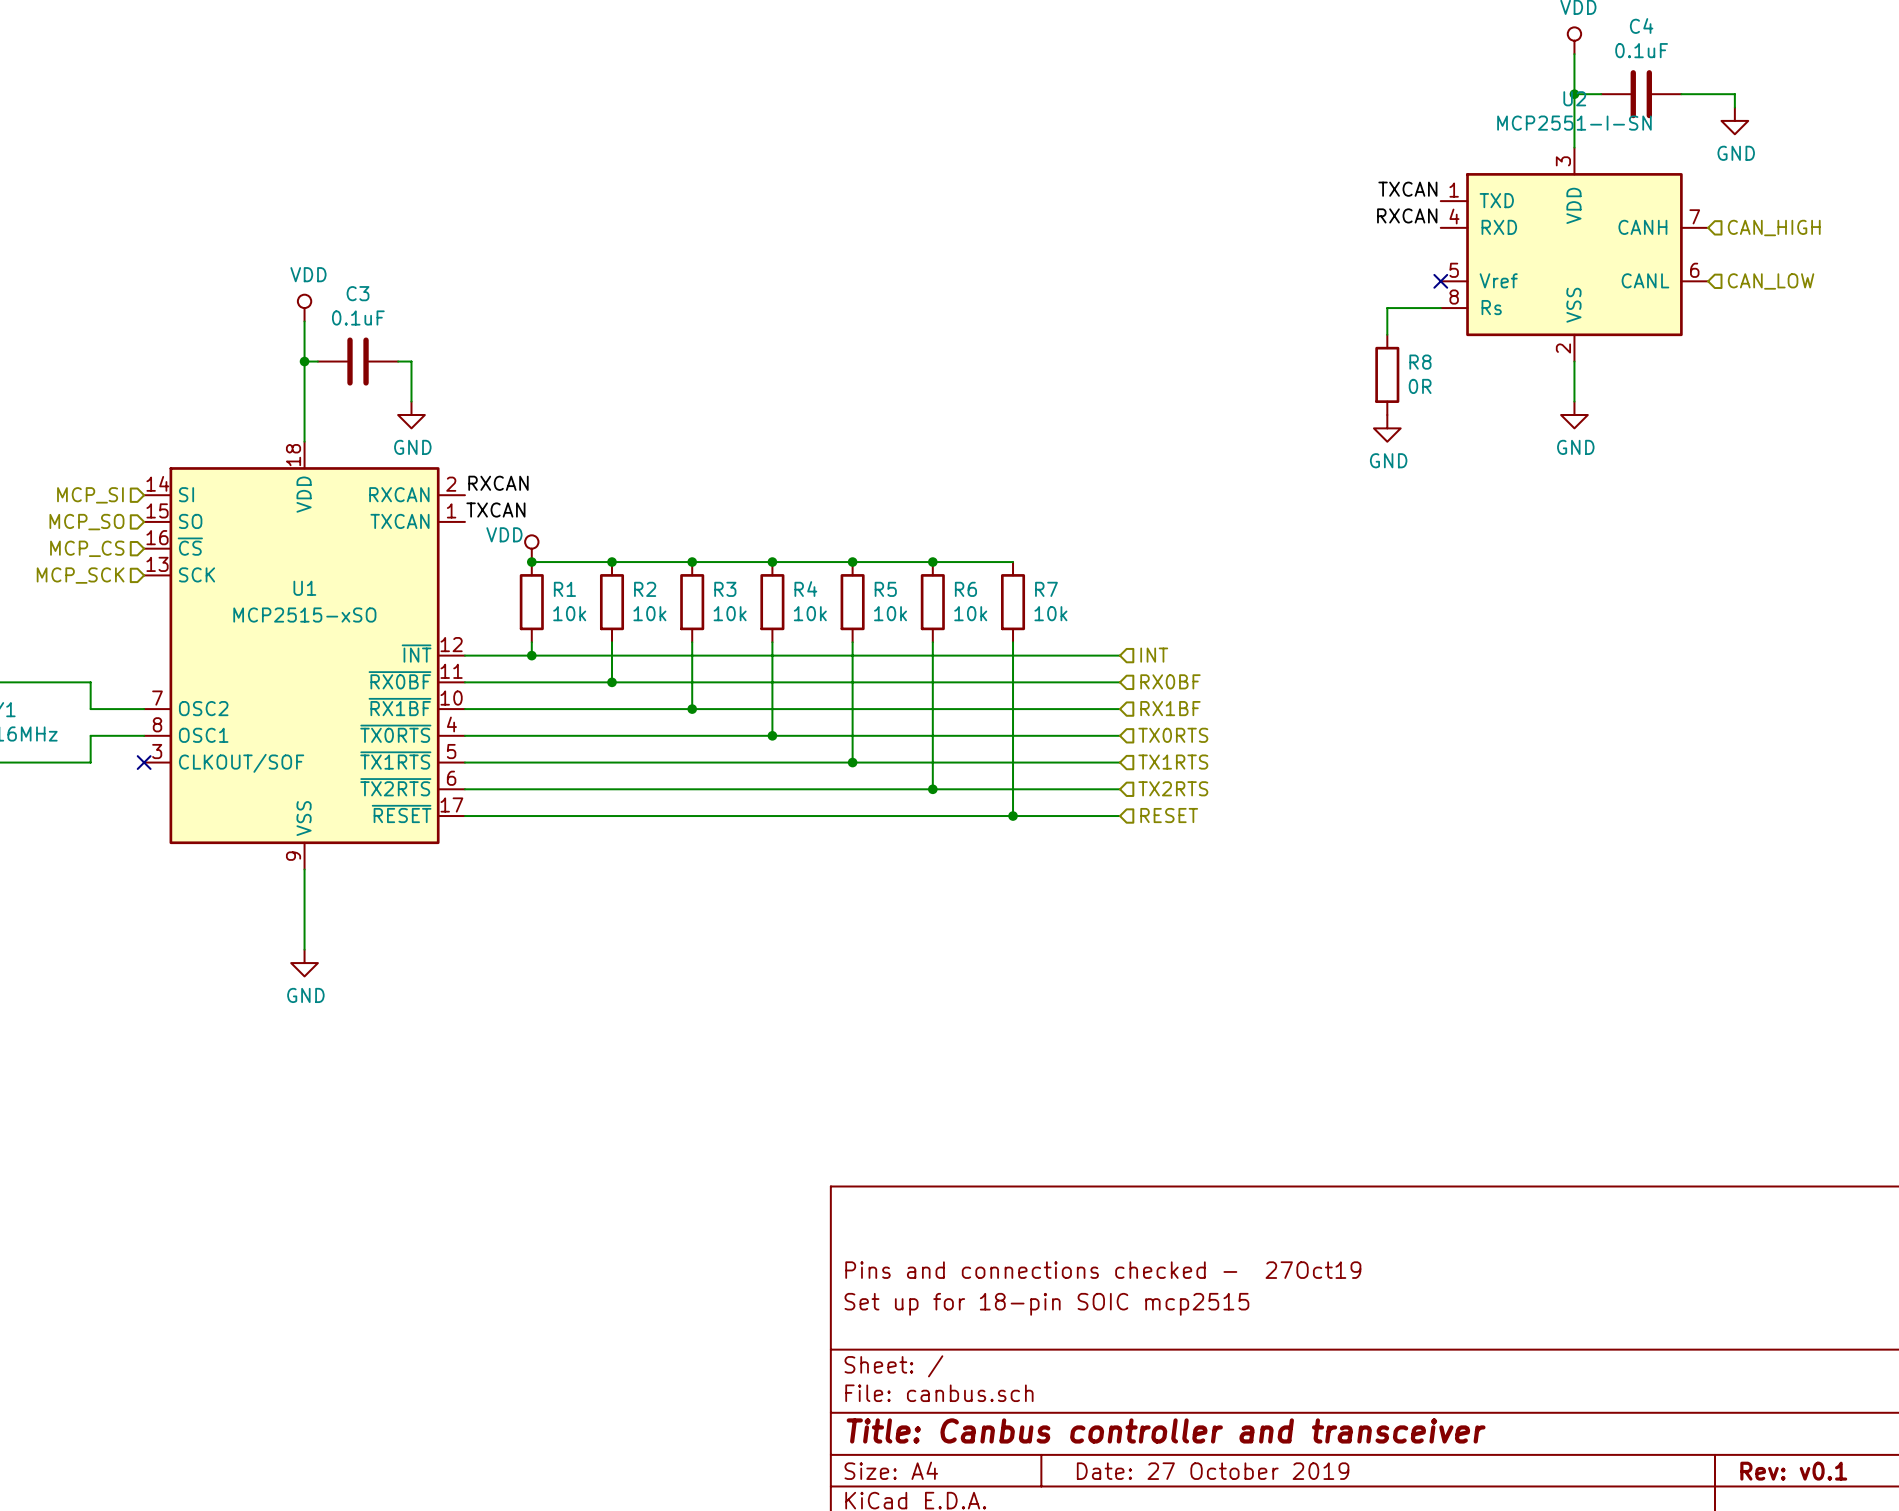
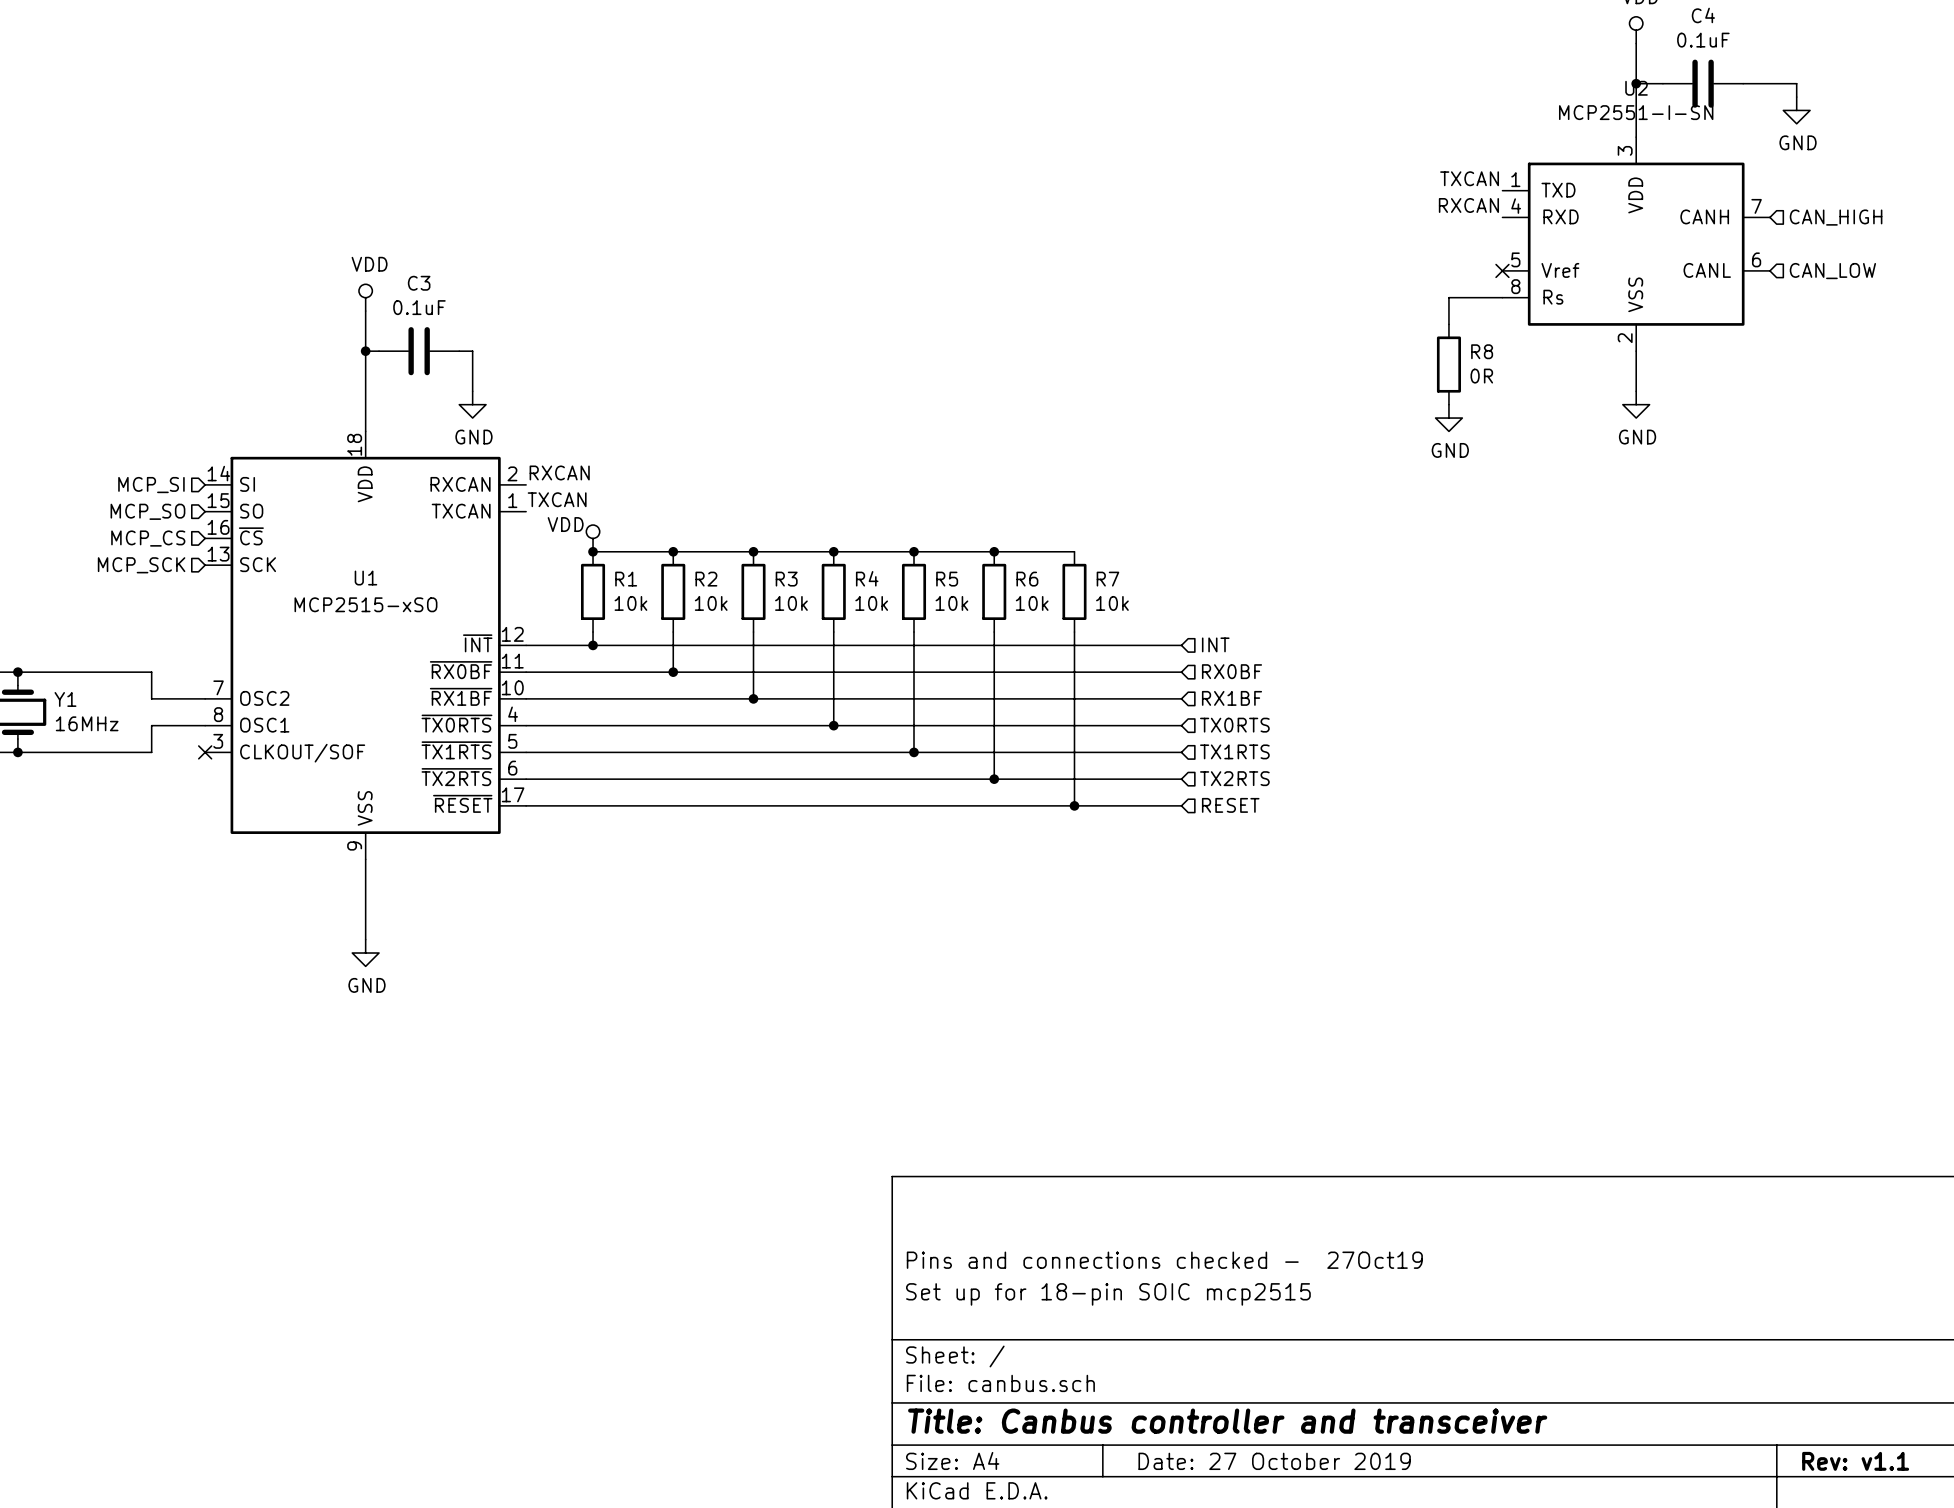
title block: Rev: v0.1 (1793, 1471) -> Rev: v1.1 (1855, 1461)

